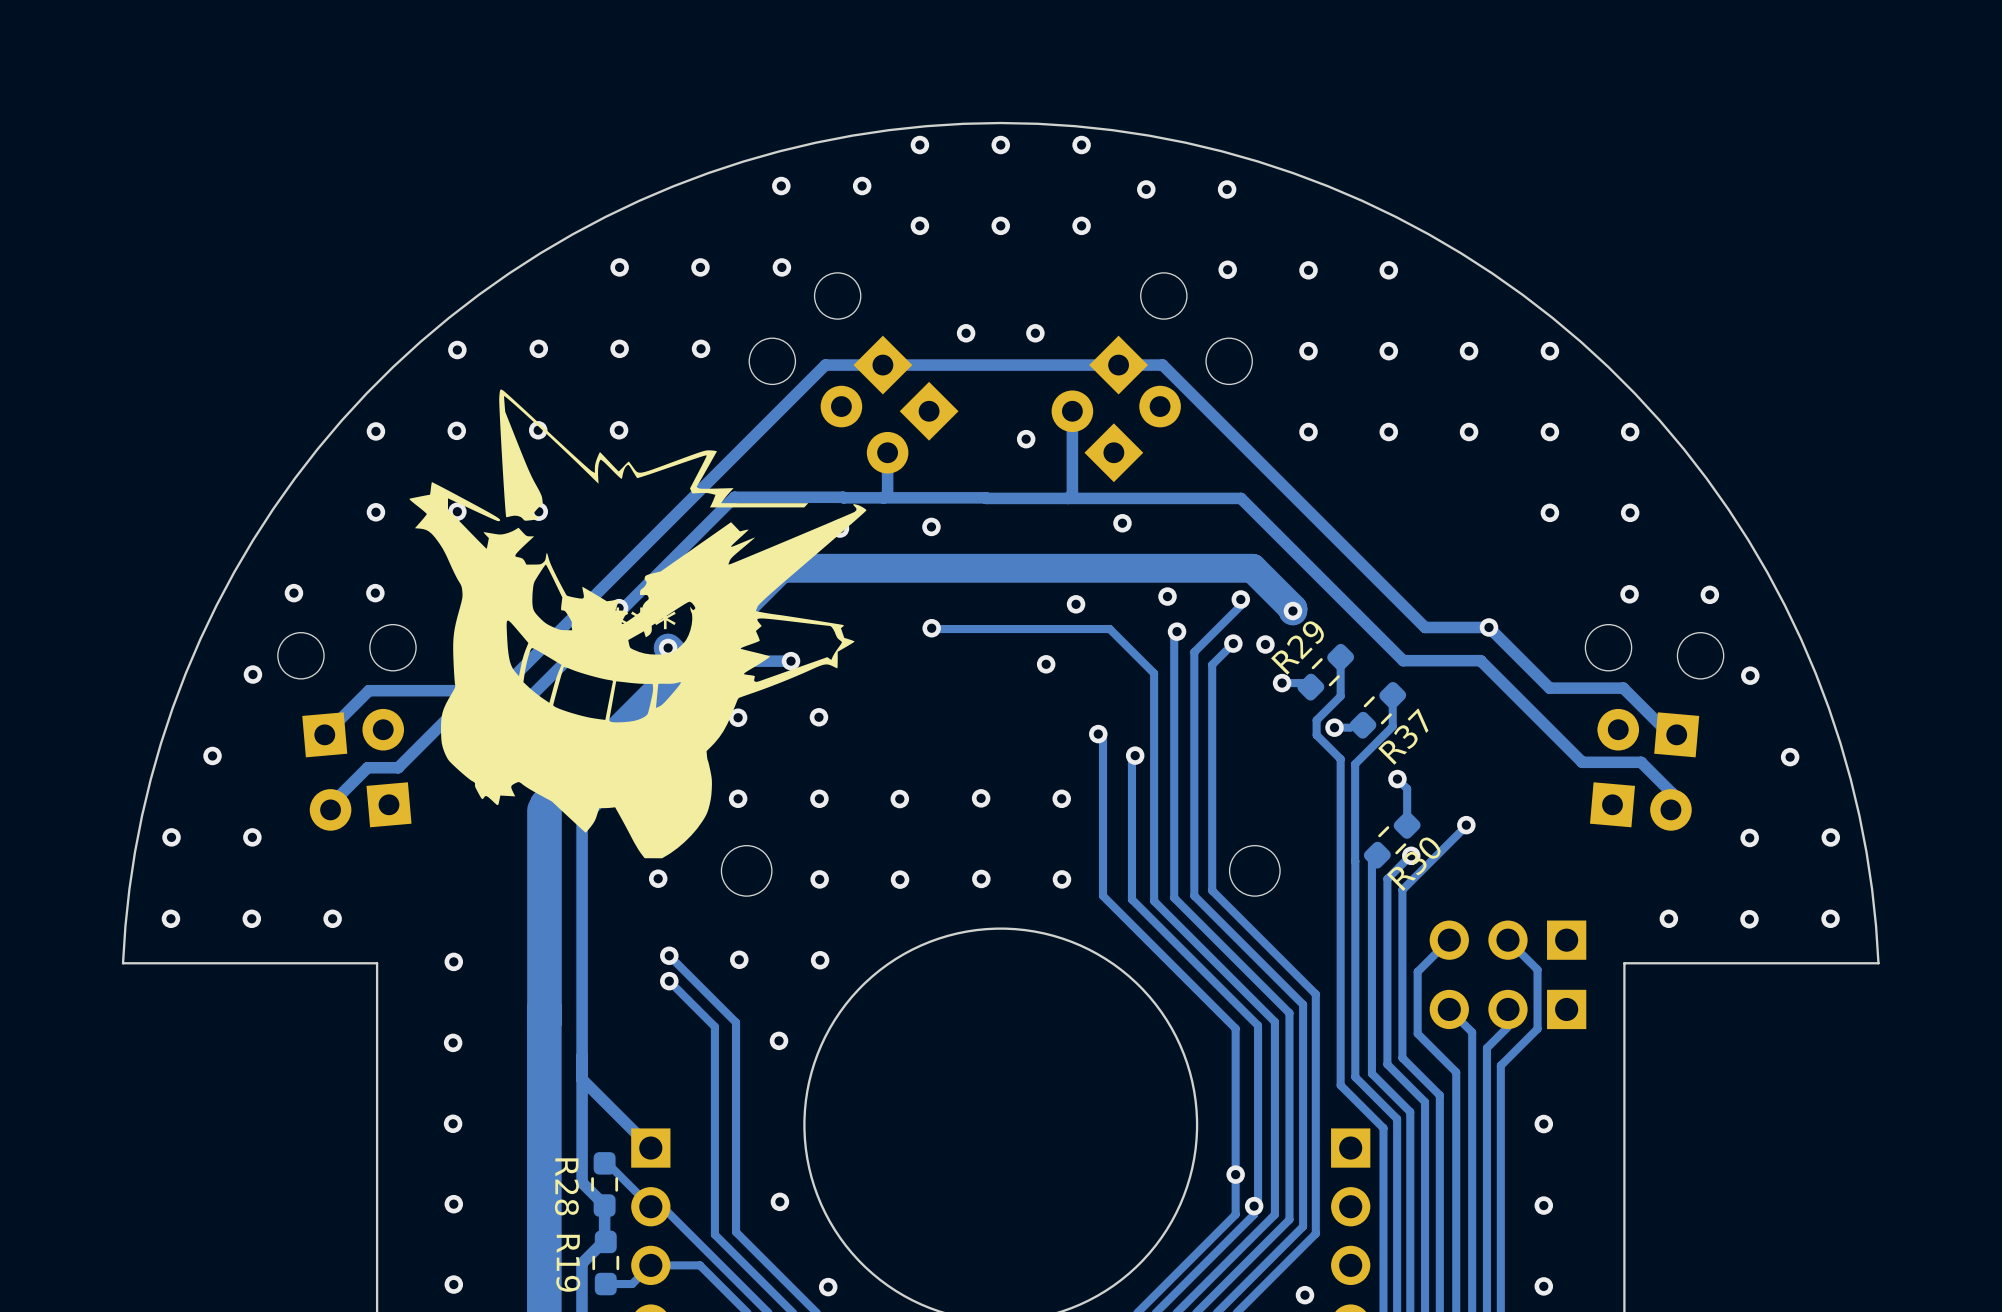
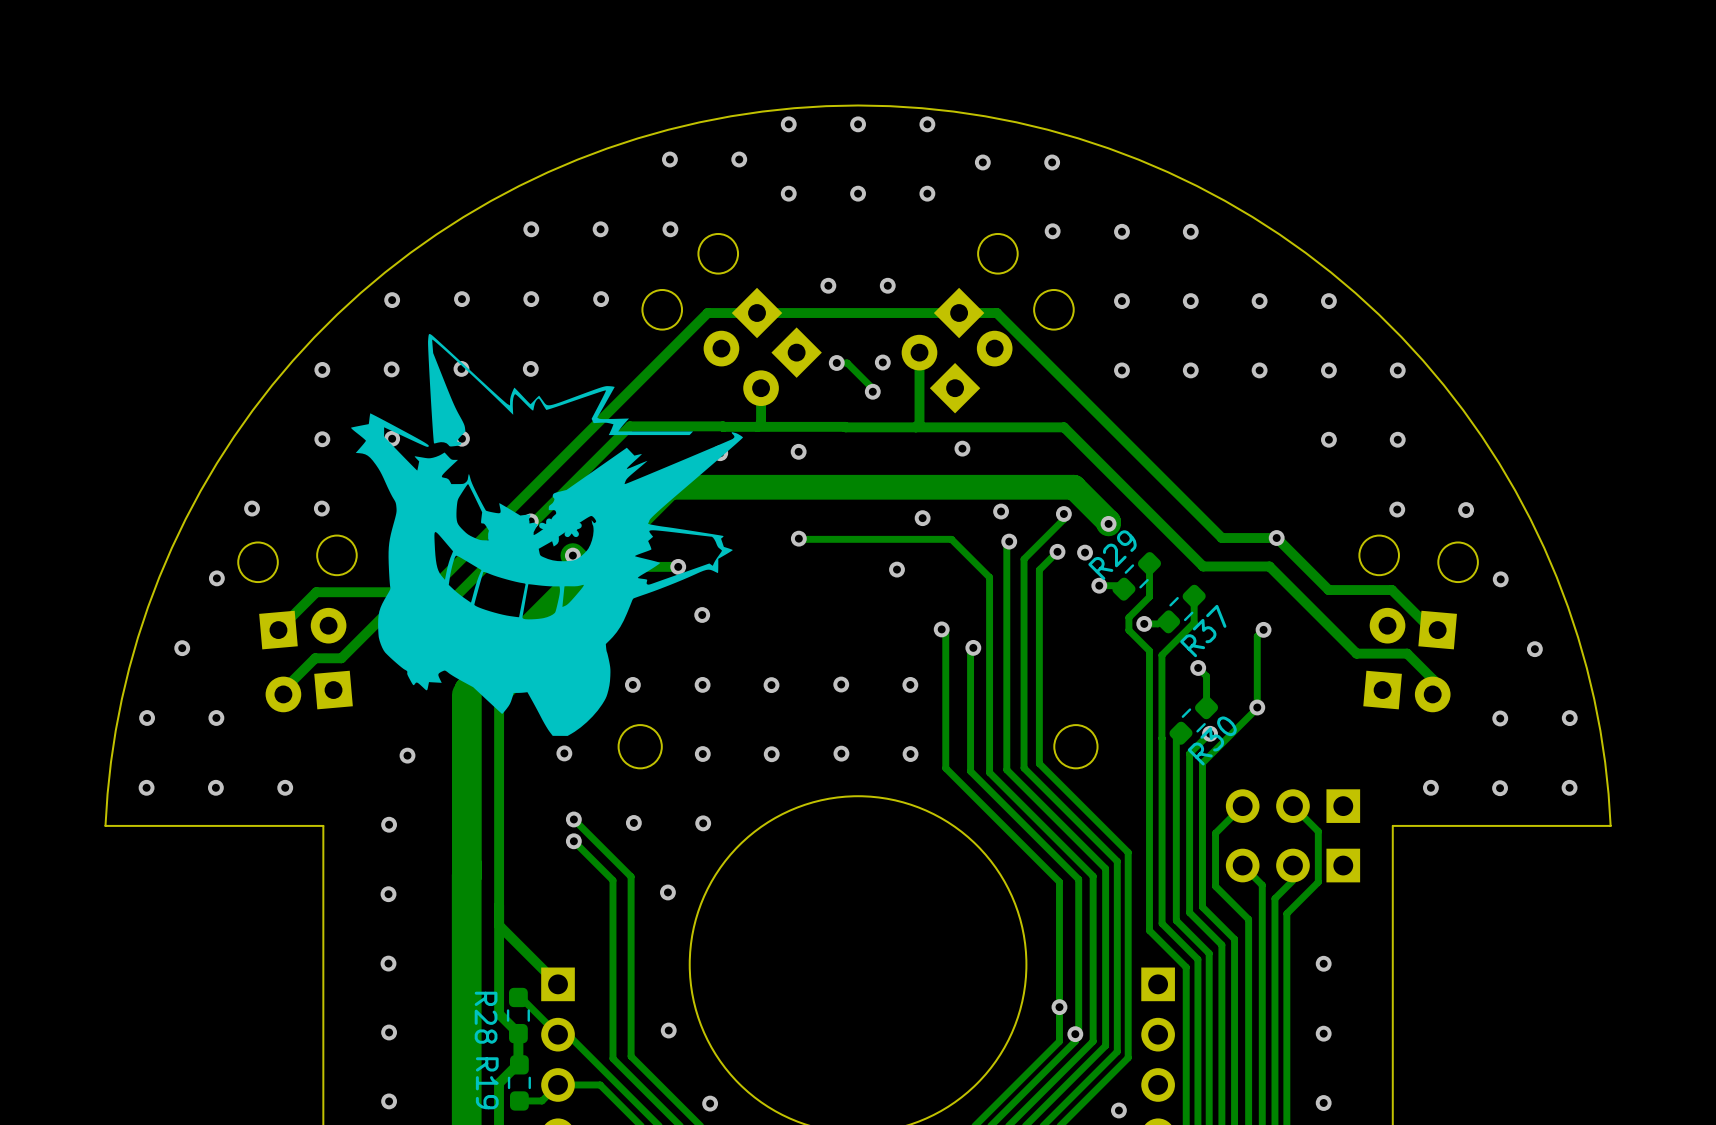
via: none -> (882, 362)
track: none -> (836, 362) (847, 362) (872, 388) (872, 391)
via: none -> (836, 362)
via: (1026, 439) -> none
via: none -> (872, 391)
via: (738, 717) -> none
track: none -> (1263, 629) (1257, 636) (1257, 707)
via: none -> (1263, 629)
via: none -> (407, 755)

